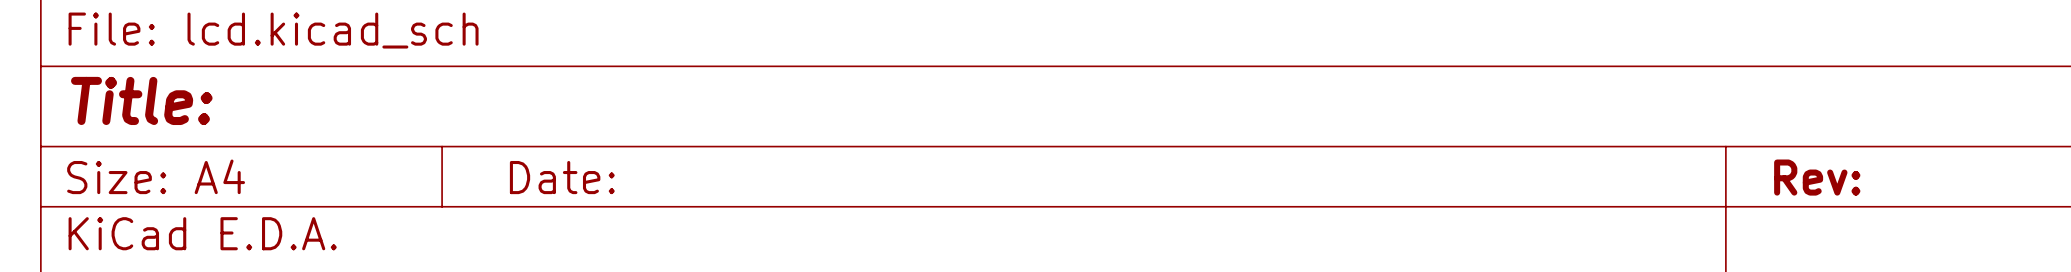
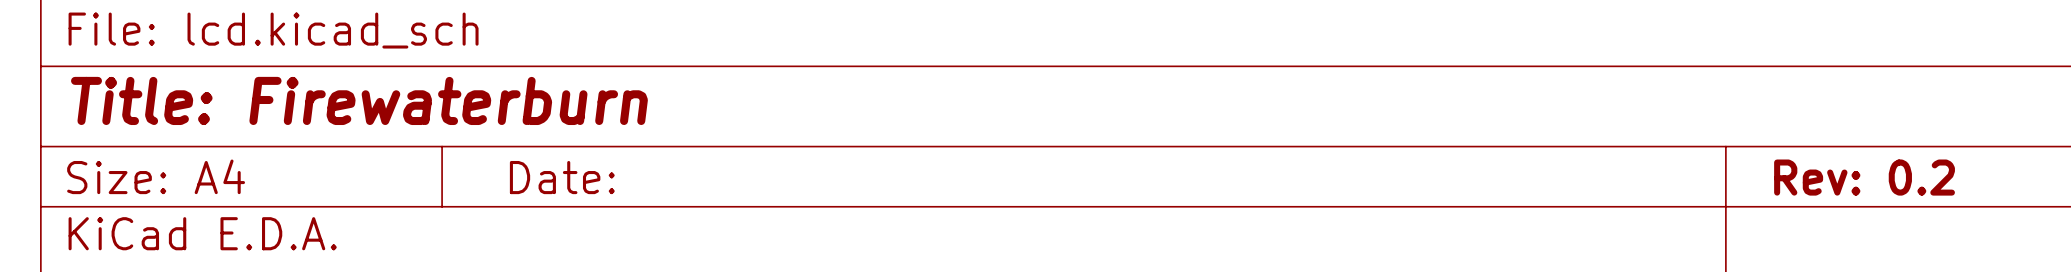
title block: Title: (141, 100) -> Title: Firewaterburn (359, 100)
title block: Rev: (1817, 177) -> Rev: 0.2 (1864, 177)

